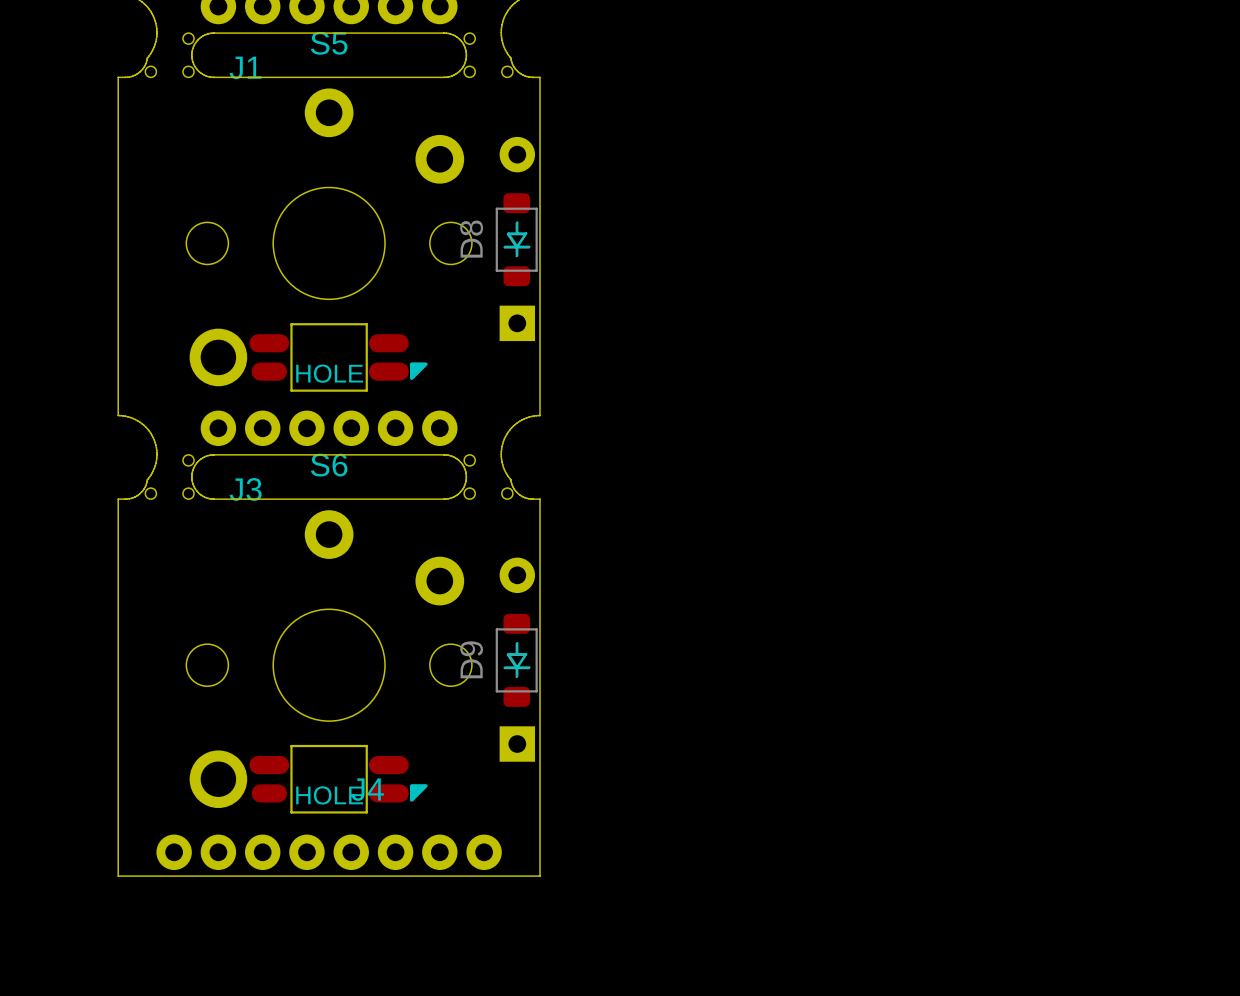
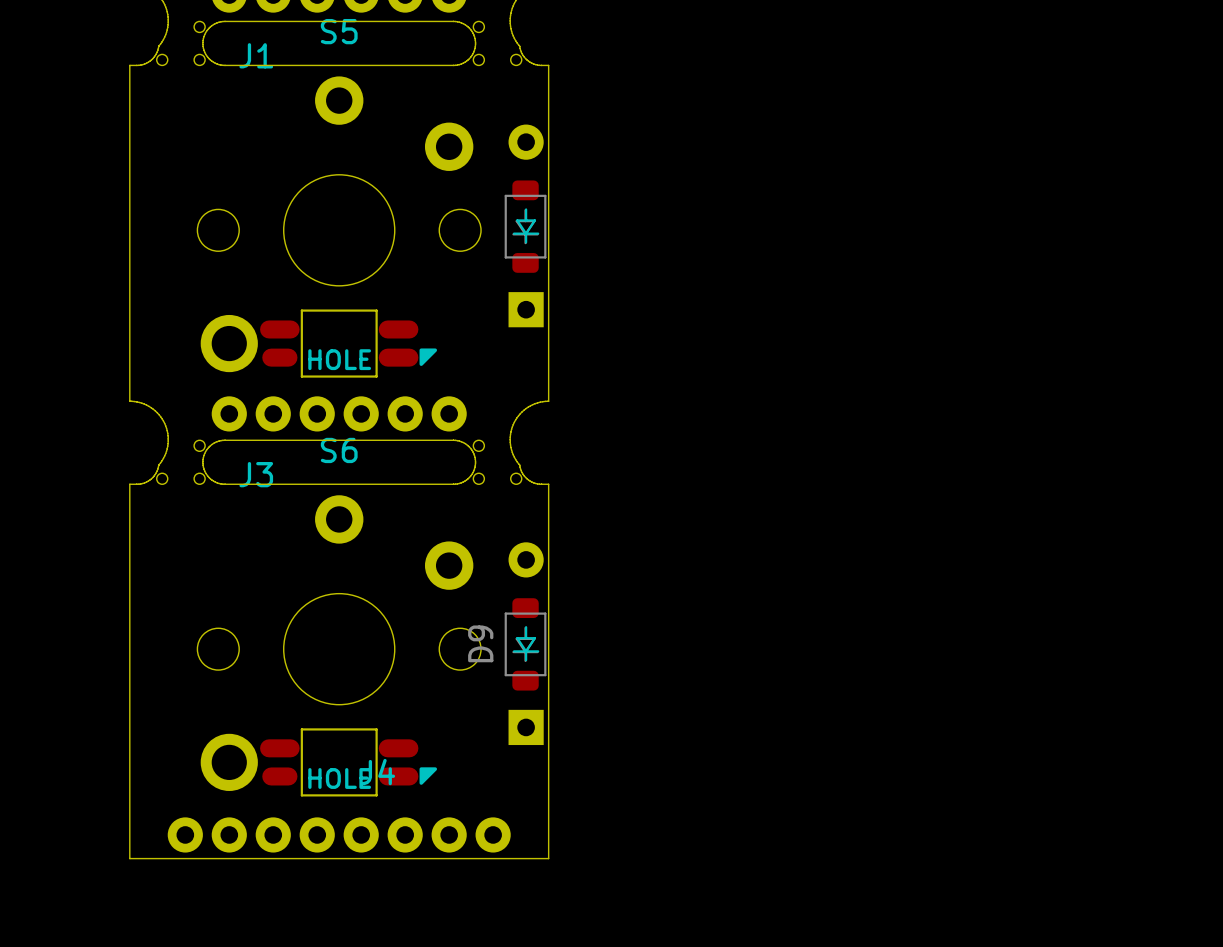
D8 name: D8 (471, 239) -> none

